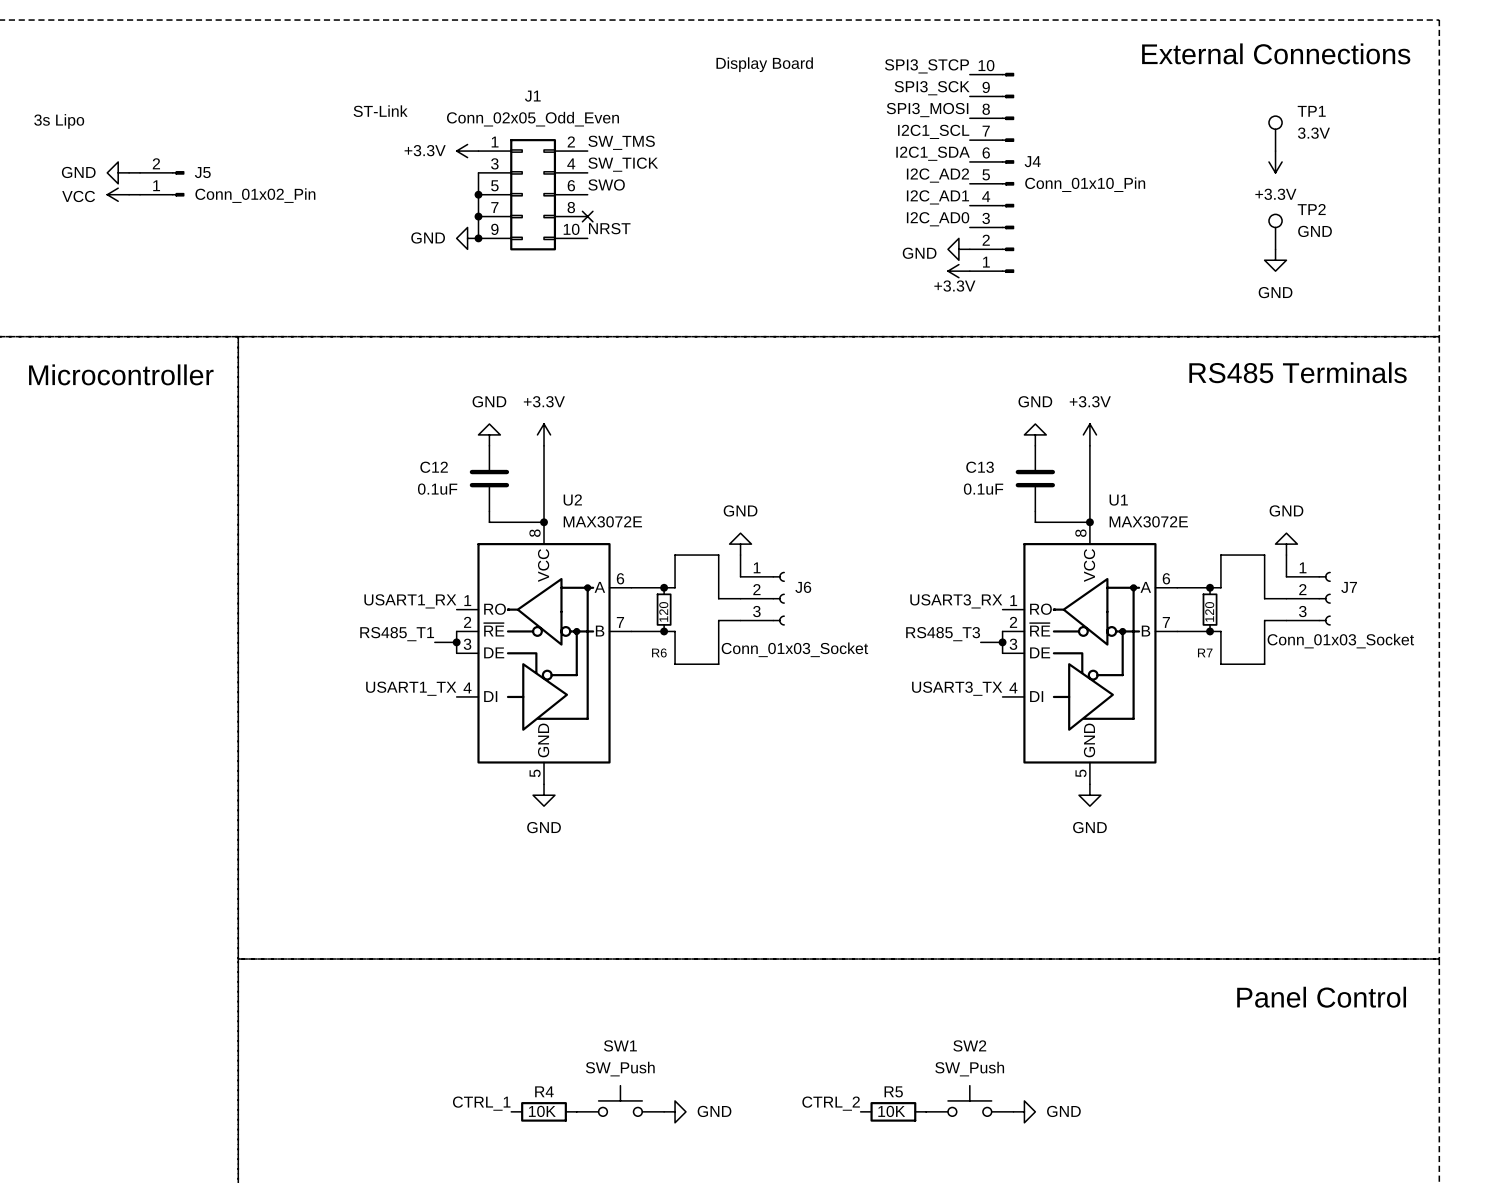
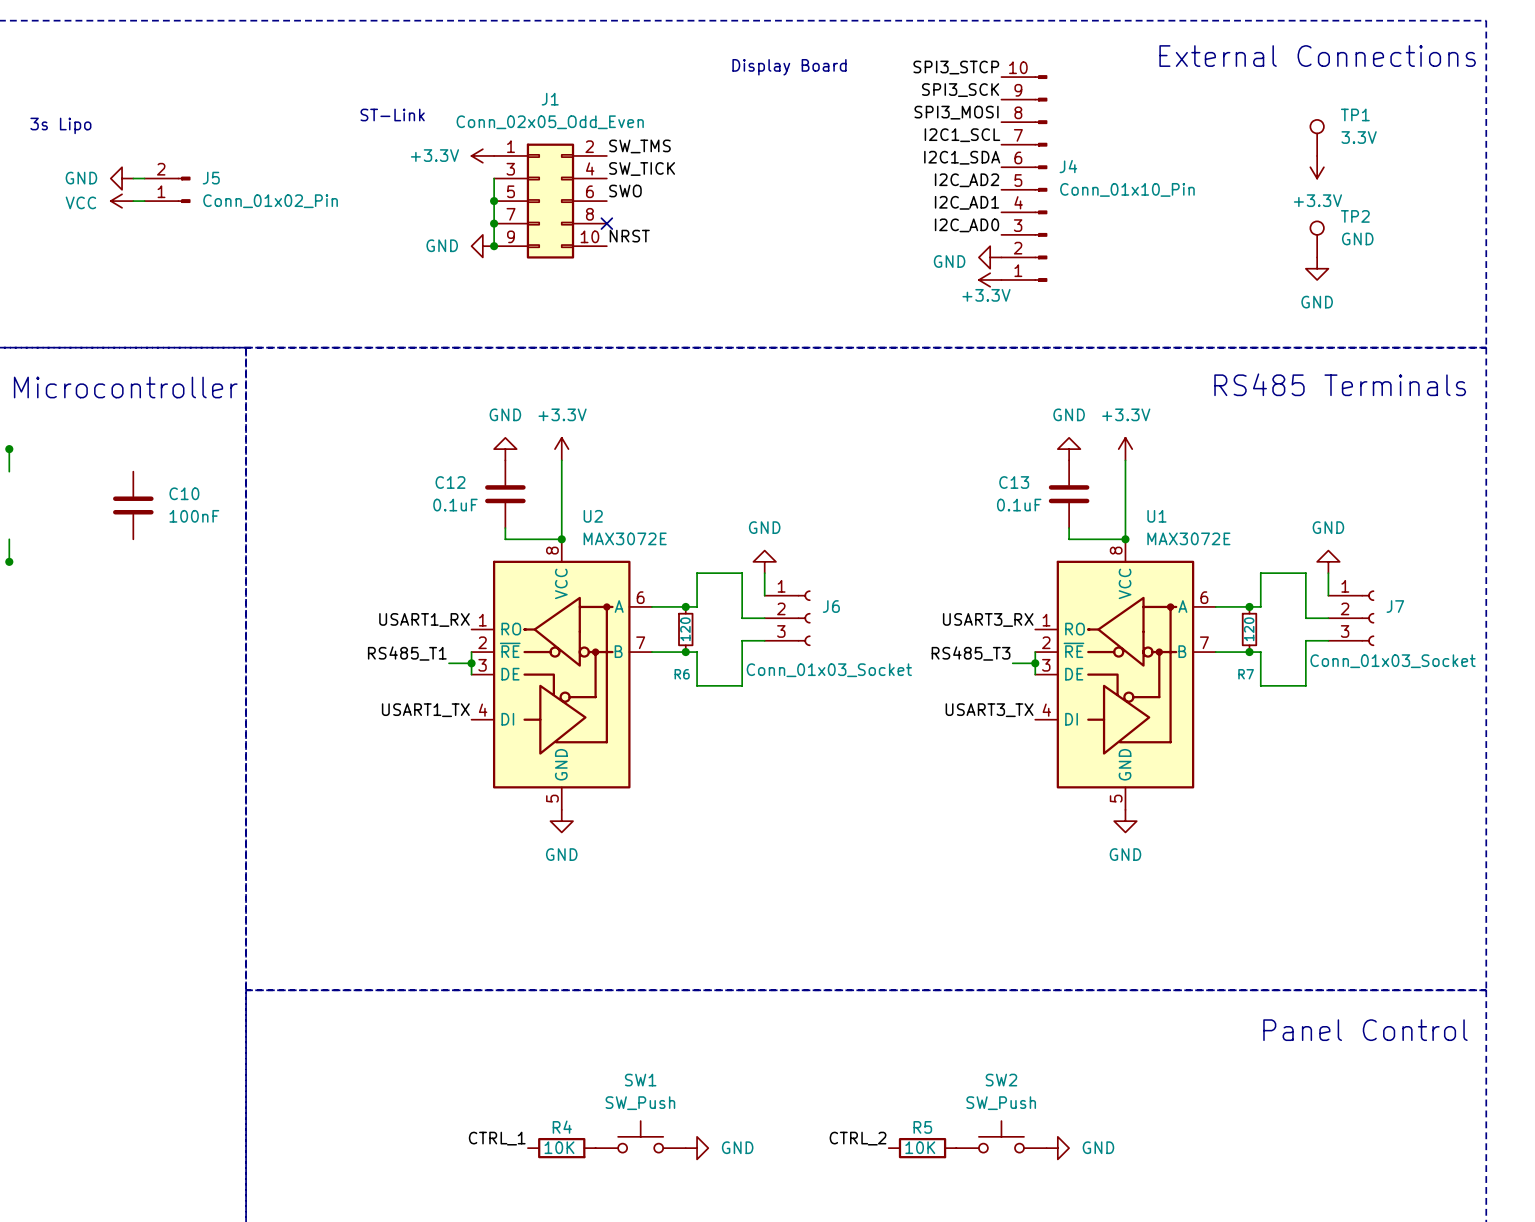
wire: none -> (9, 449) (9, 471)
junction: none -> (9, 449)
C10: none -> 100nF (133, 505)
wire: none -> (9, 539) (9, 561)
junction: none -> (9, 561)

